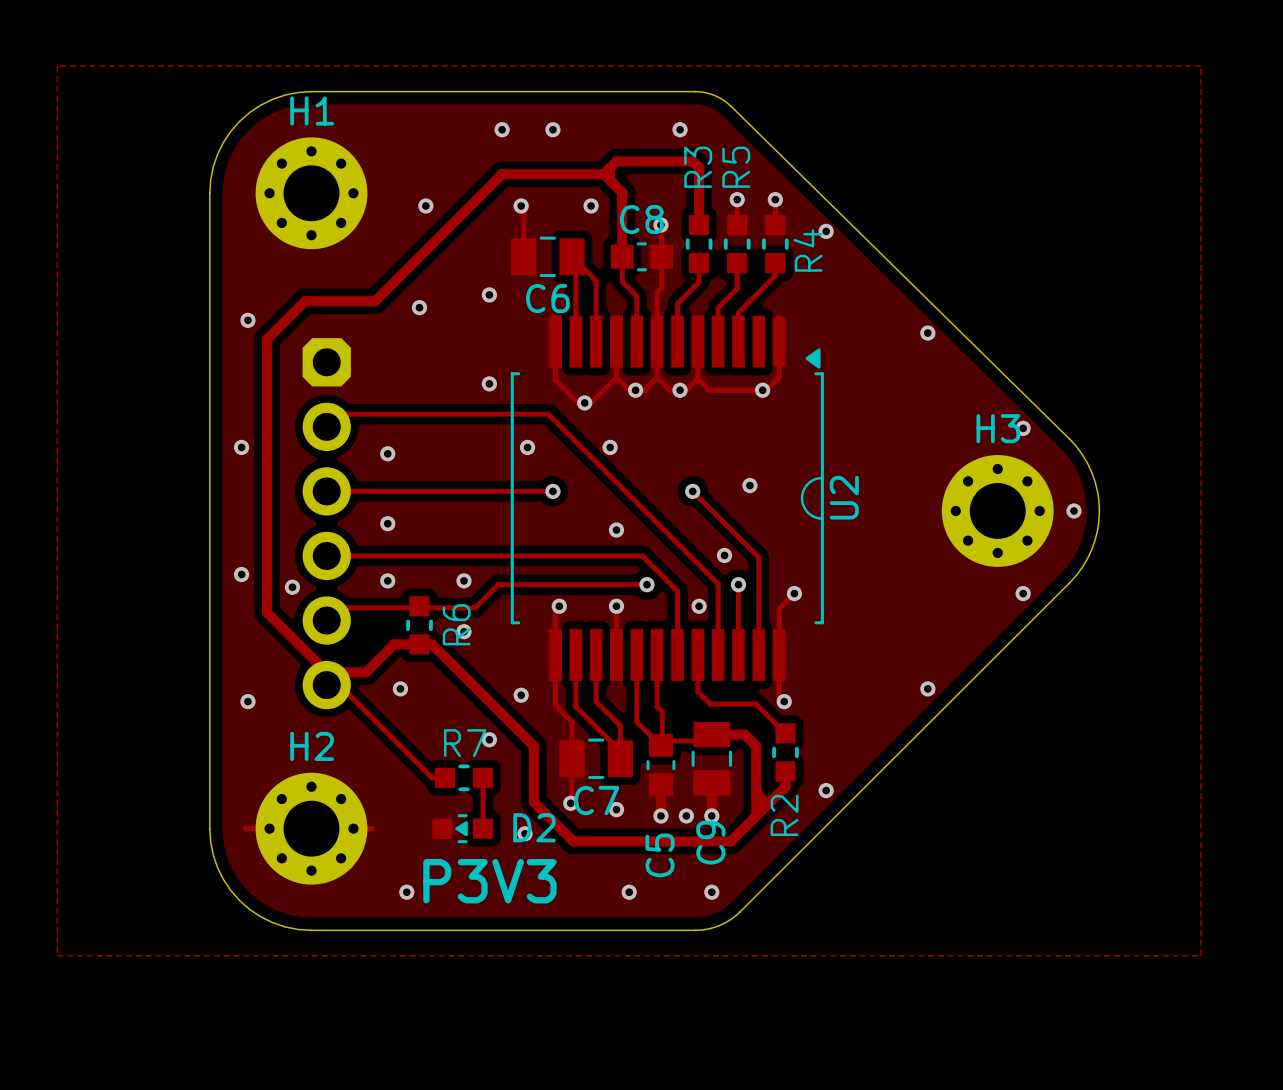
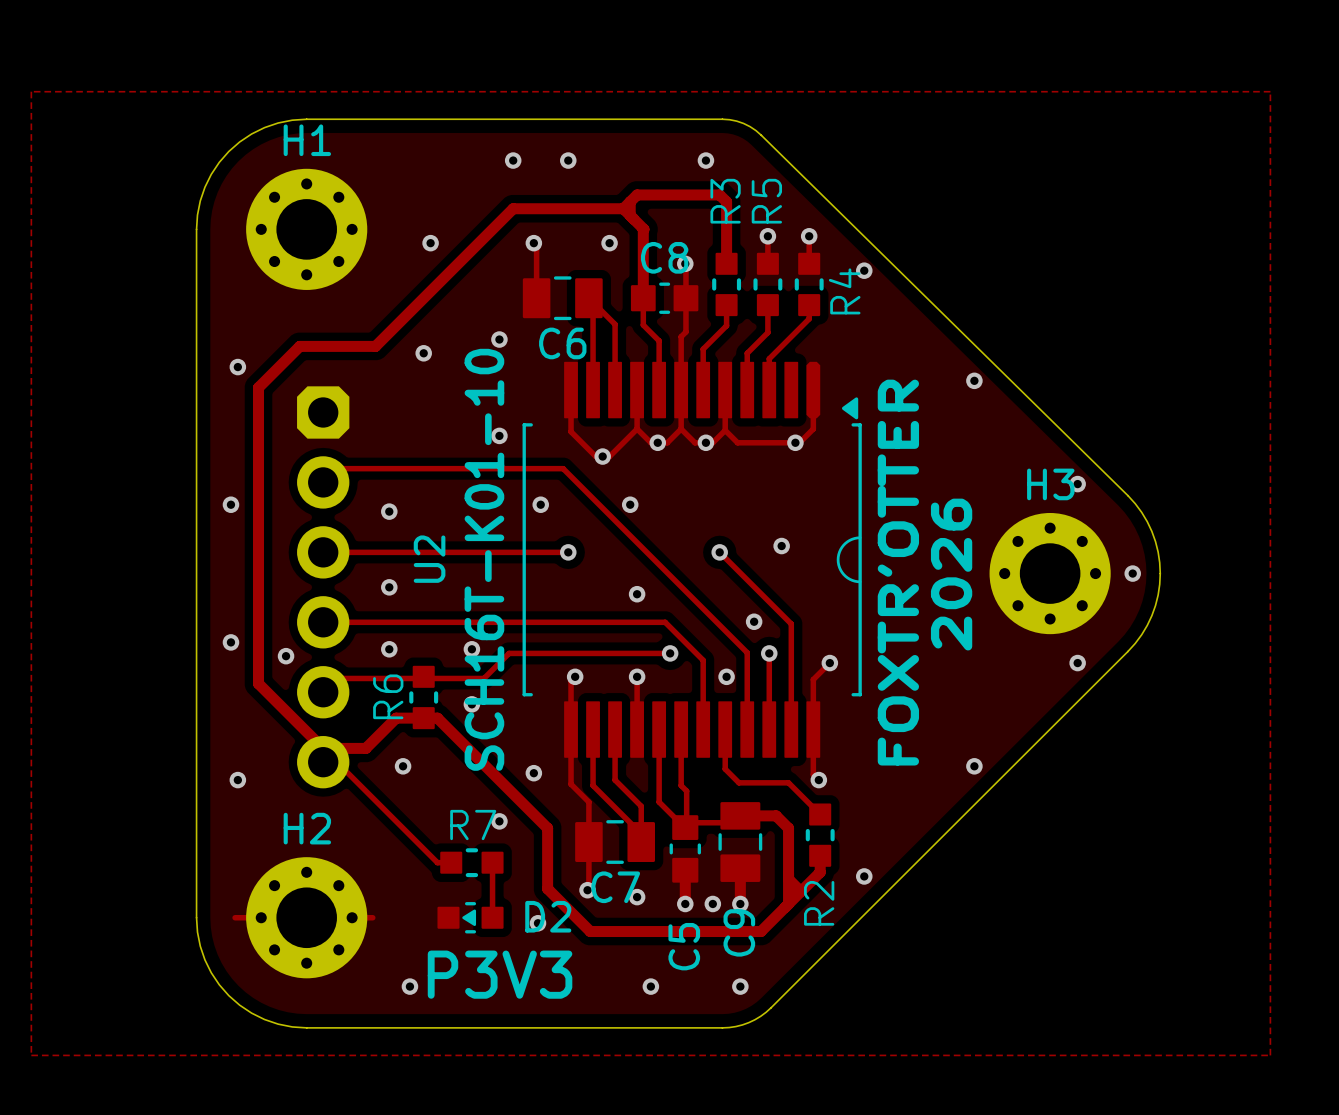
U2 name position: U2 (844, 497) -> U2 (429, 559)
text: none -> SCH16T-K01-10 (484, 559)
text: none -> FOXTR'OTTER (898, 572)
text: none -> 2026 (951, 574)
R6 name position: R6 (456, 624) -> R6 (388, 696)

